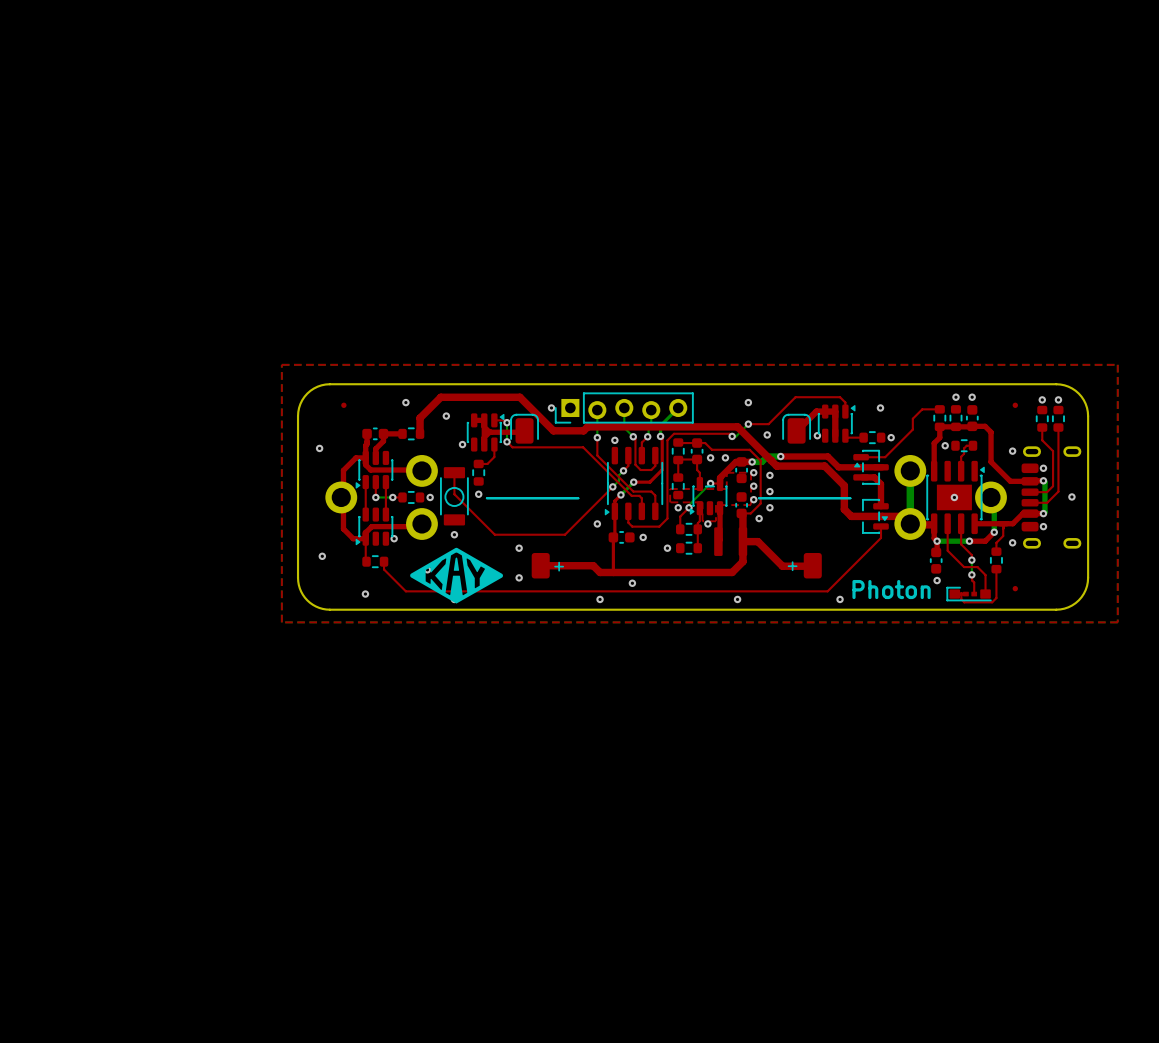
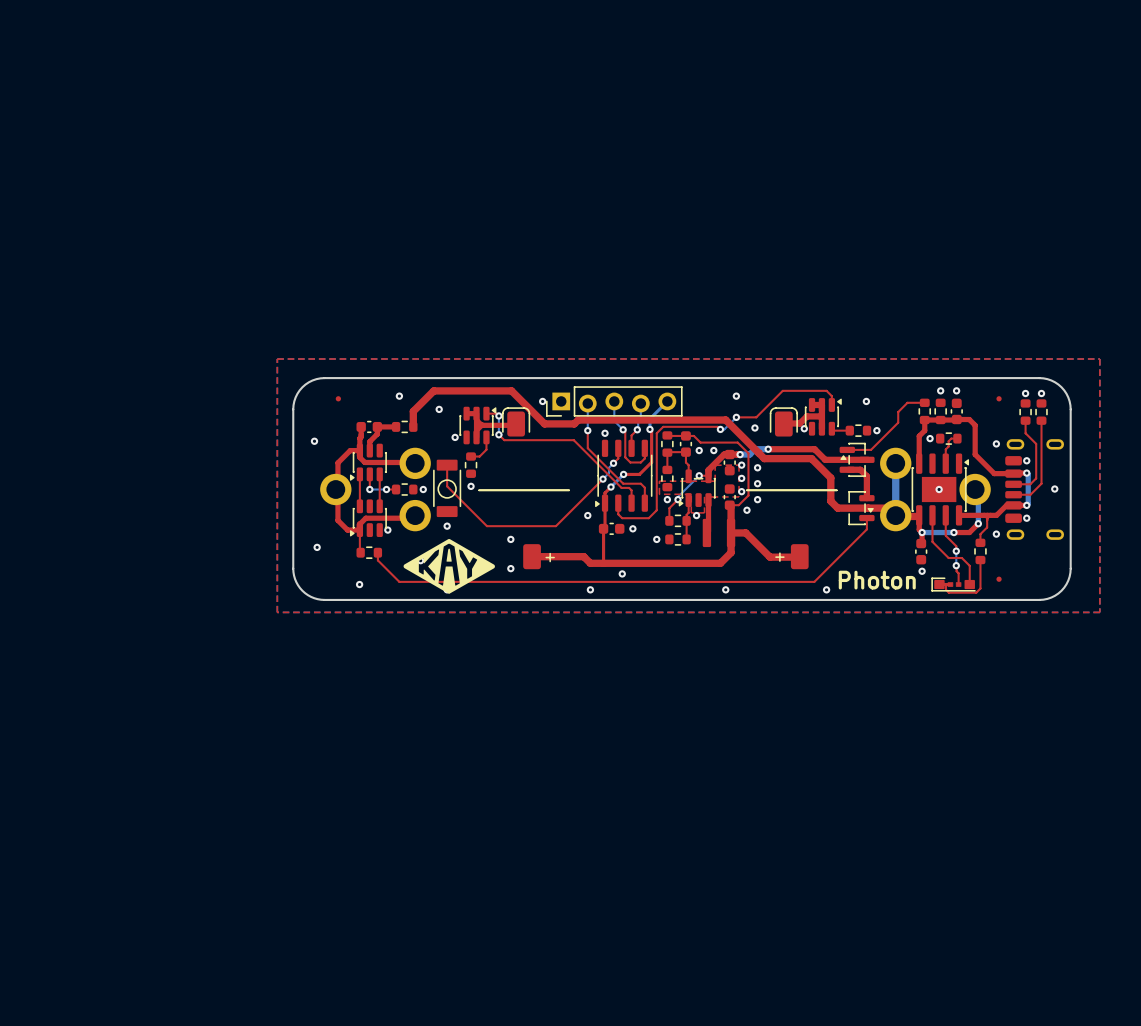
top track: (825, 411) (816, 411) (796, 431) -> none
top track: none -> (821, 416) (806, 416) (799, 423) (784, 423)

